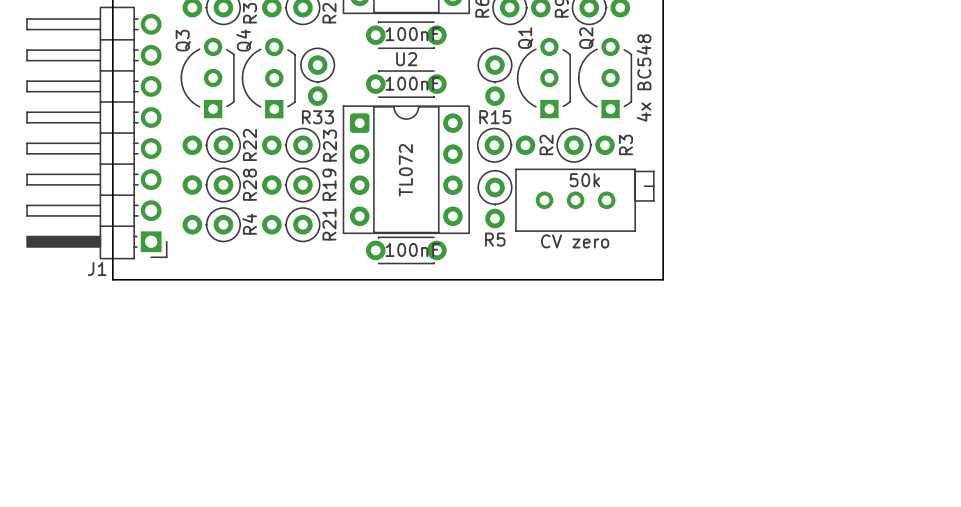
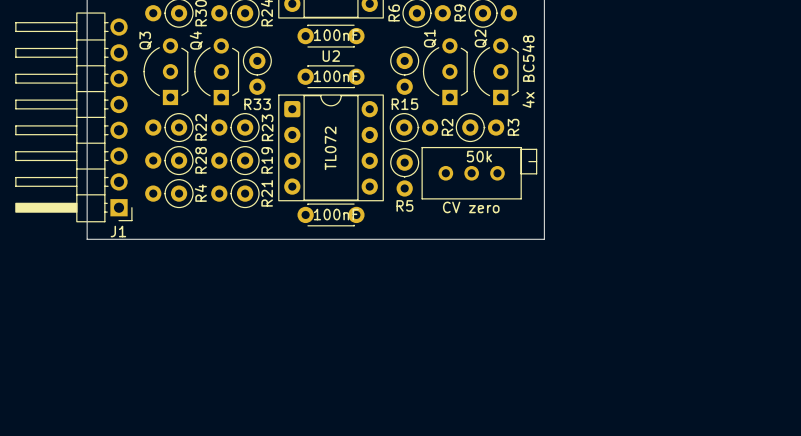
J1 name position: J1 (97, 269) -> J1 (118, 231)

